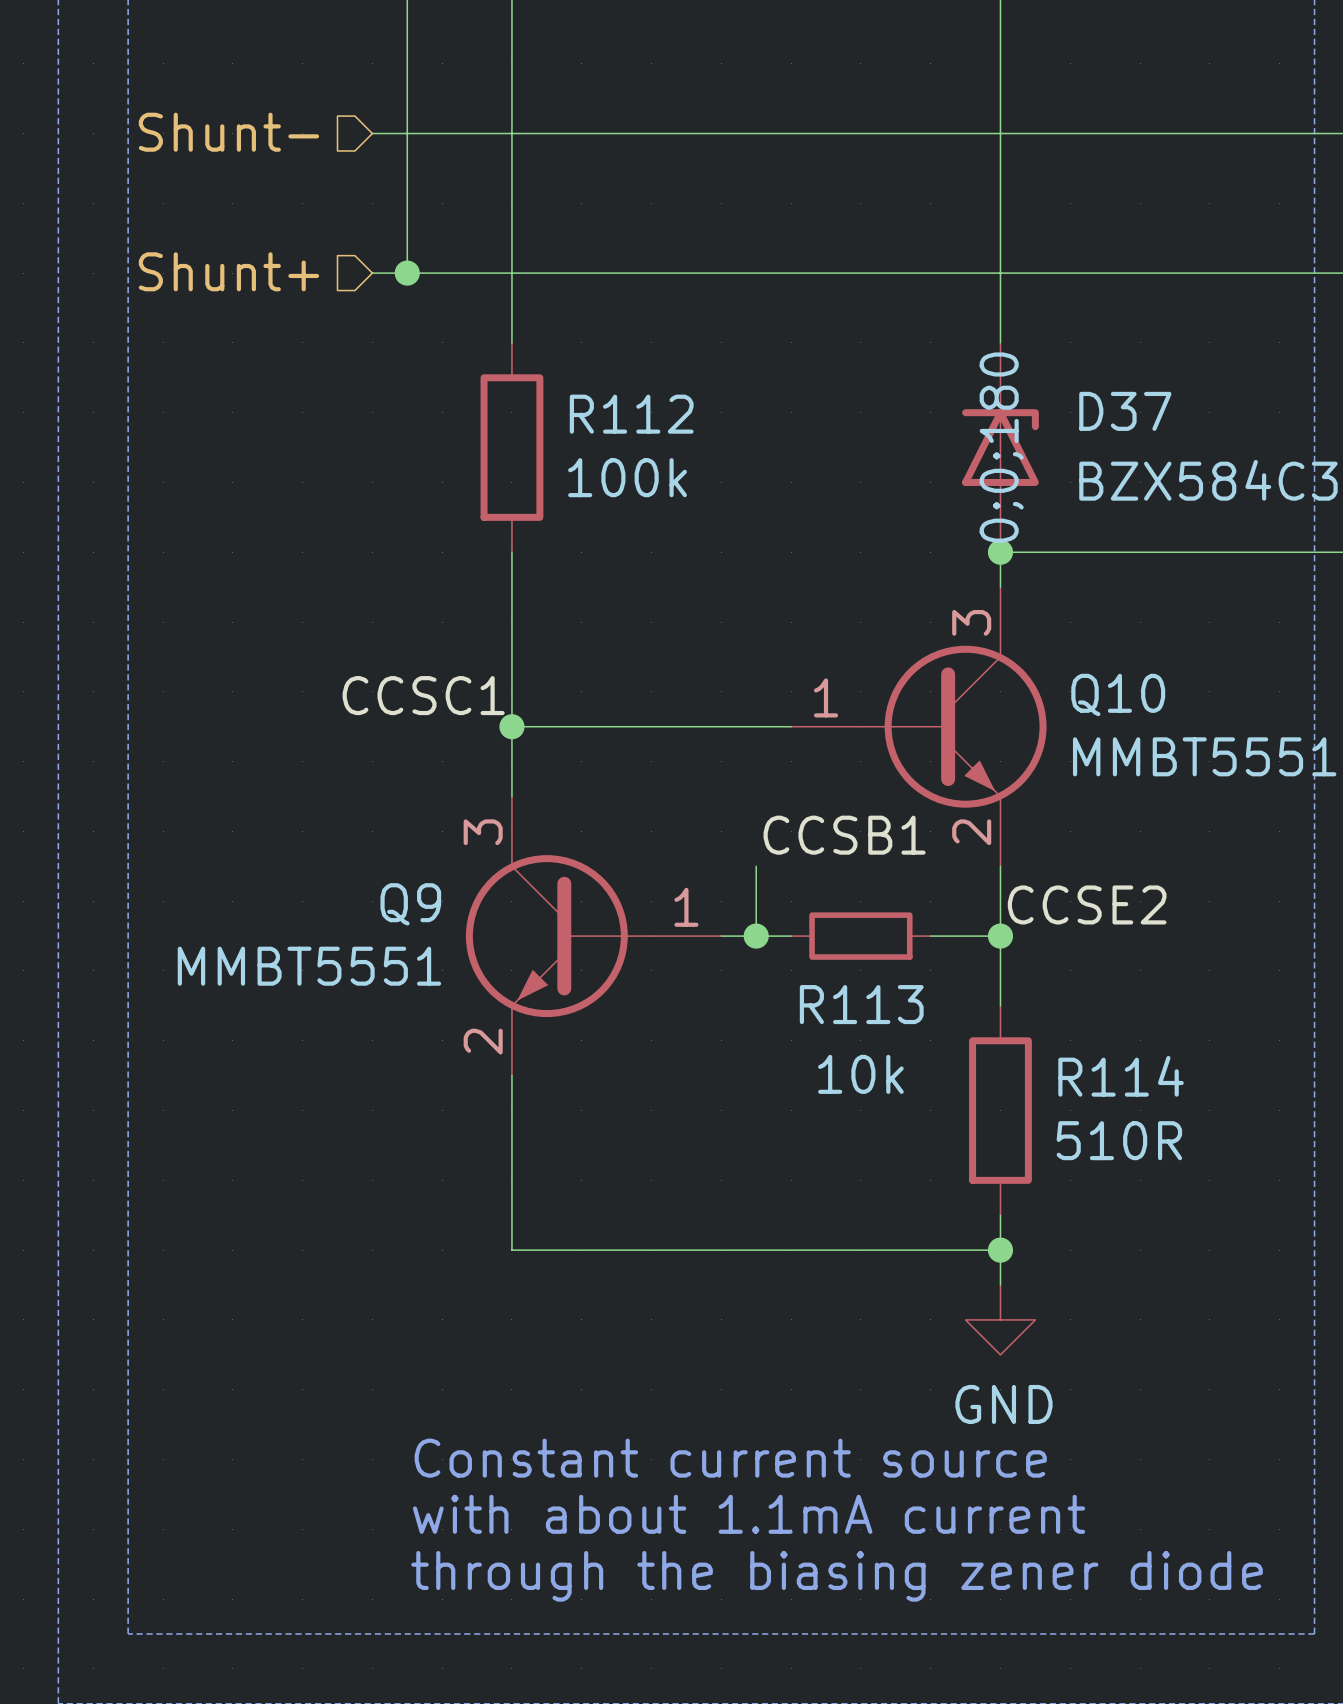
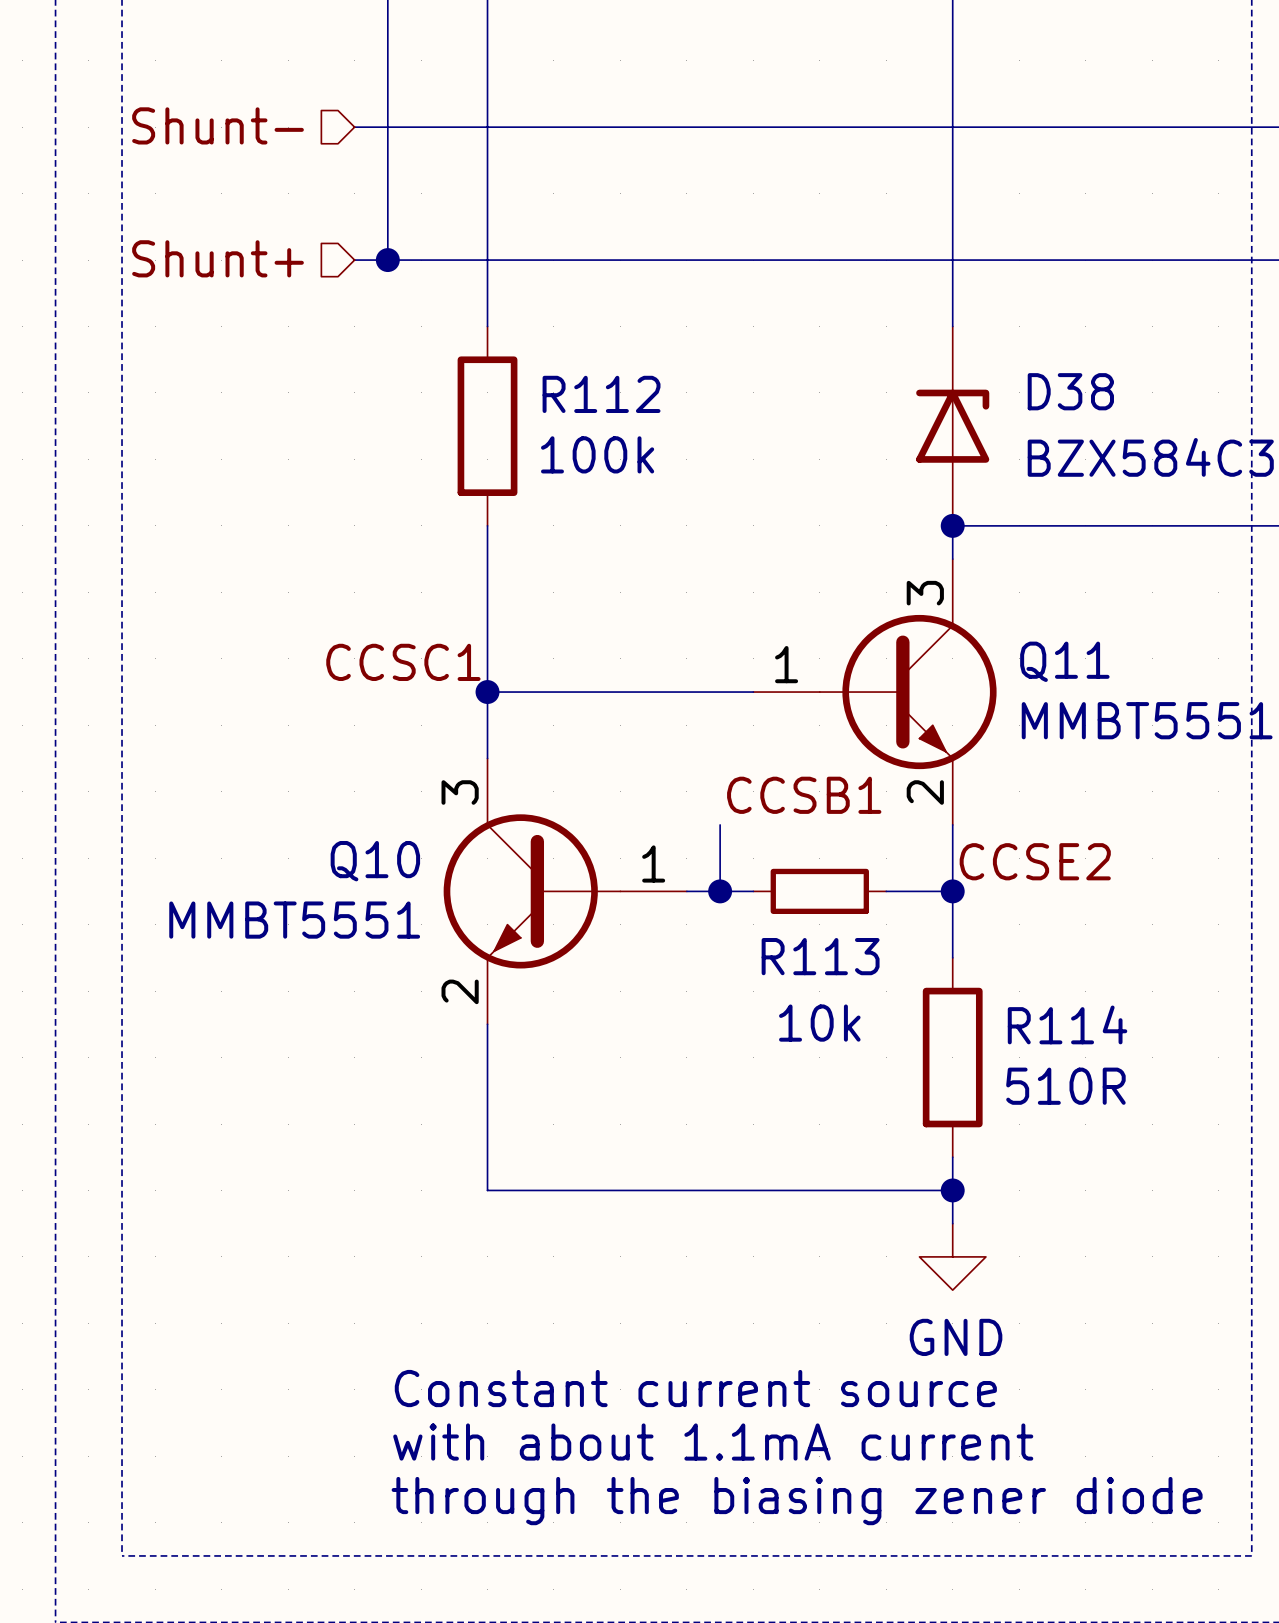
D37 name: D37 (1125, 411) -> D38 (1070, 391)
D37 text: 0;0;180 (1001, 447) -> none
Q10 name: Q10 (1118, 694) -> Q11 (1064, 661)
Q9 name: Q9 (410, 904) -> Q10 (375, 861)

